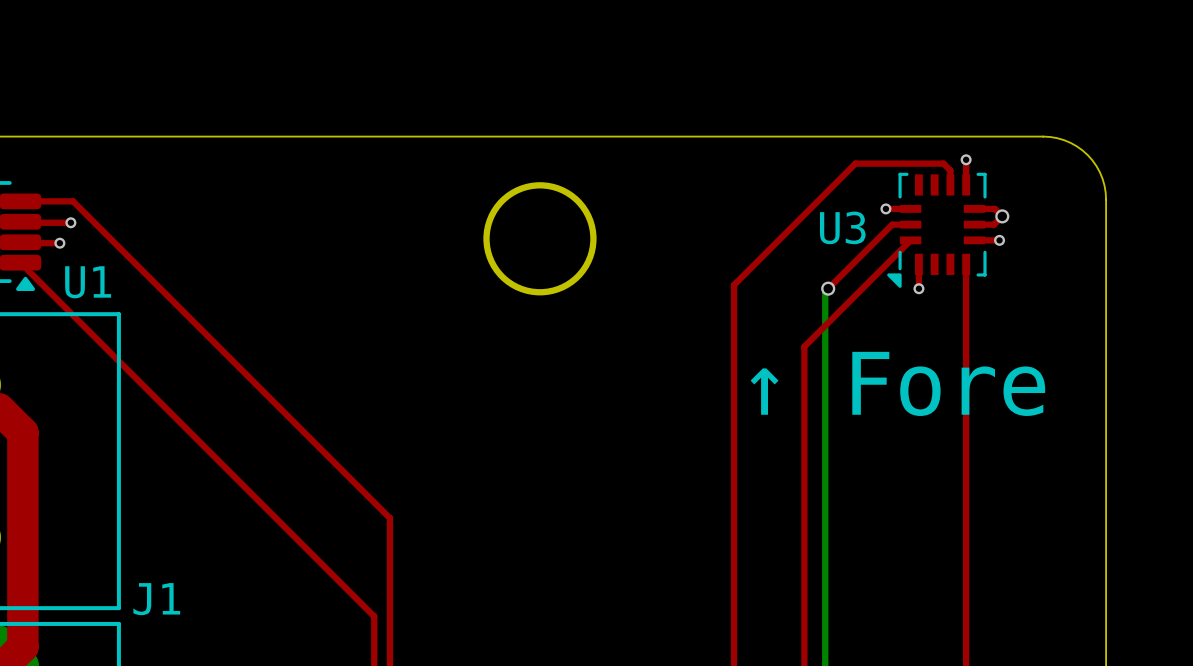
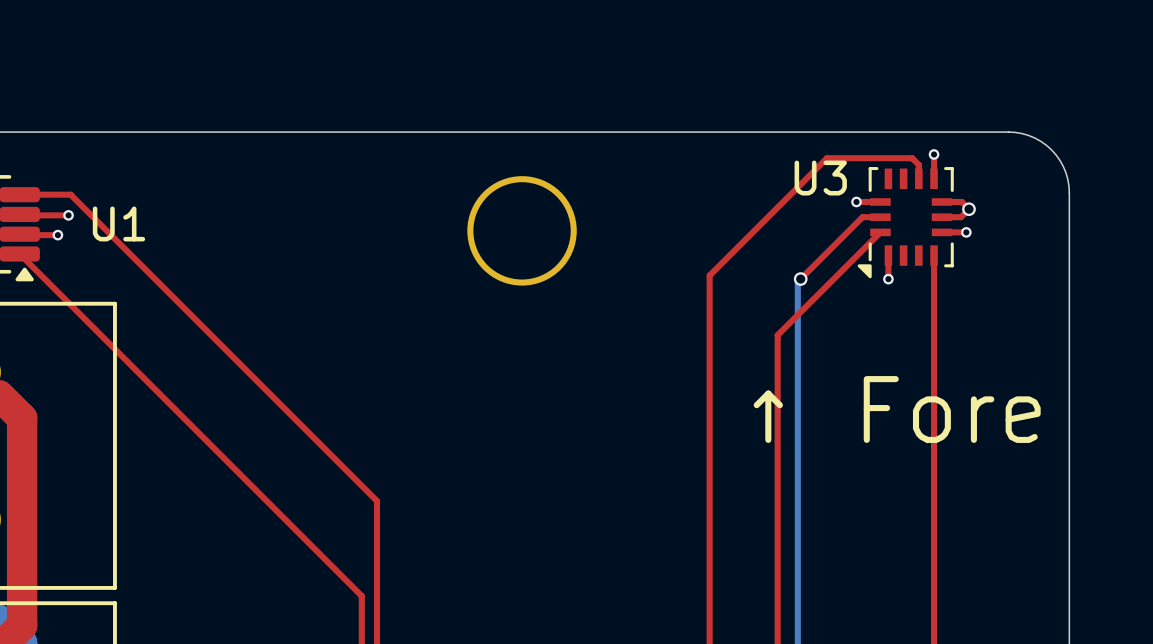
U3 name position: U3 (842, 227) -> U3 (820, 178)
U1 name position: U1 (88, 282) -> U1 (118, 223)
part text position: ↑ Fore (897, 383) -> ↑ Fore (897, 409)
J1 name: J1 (156, 599) -> none

